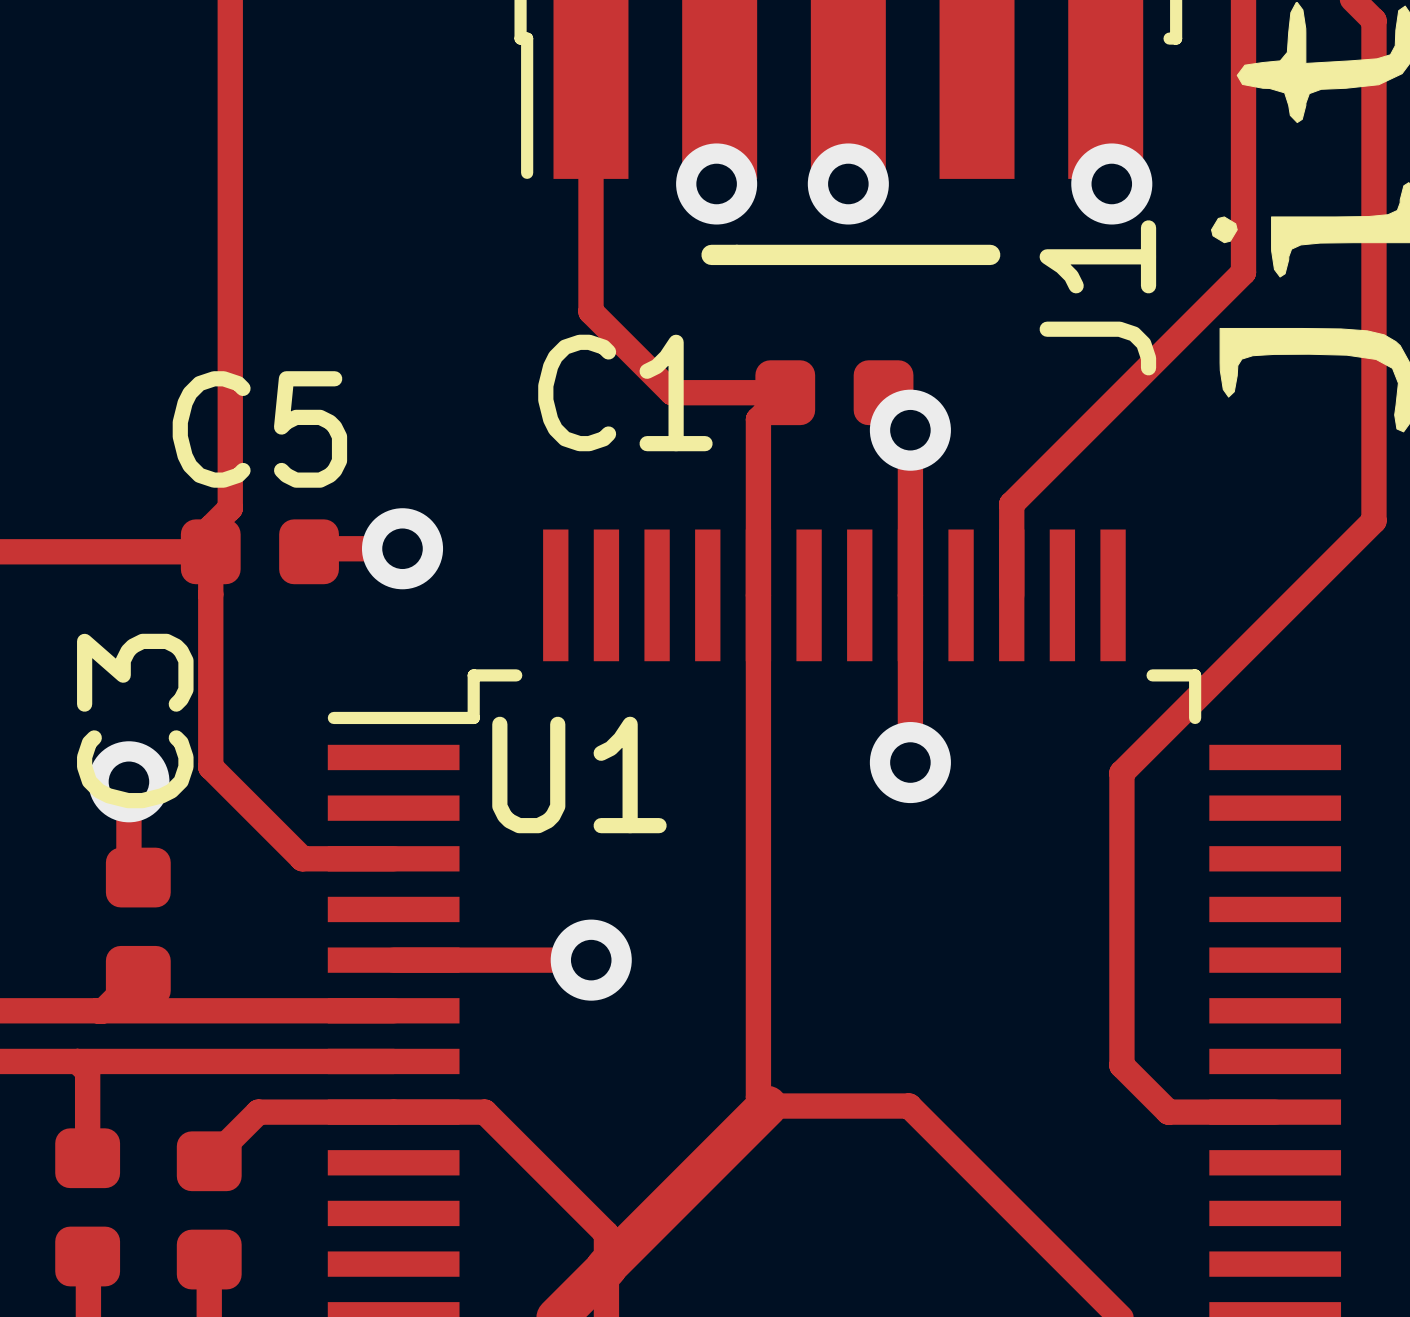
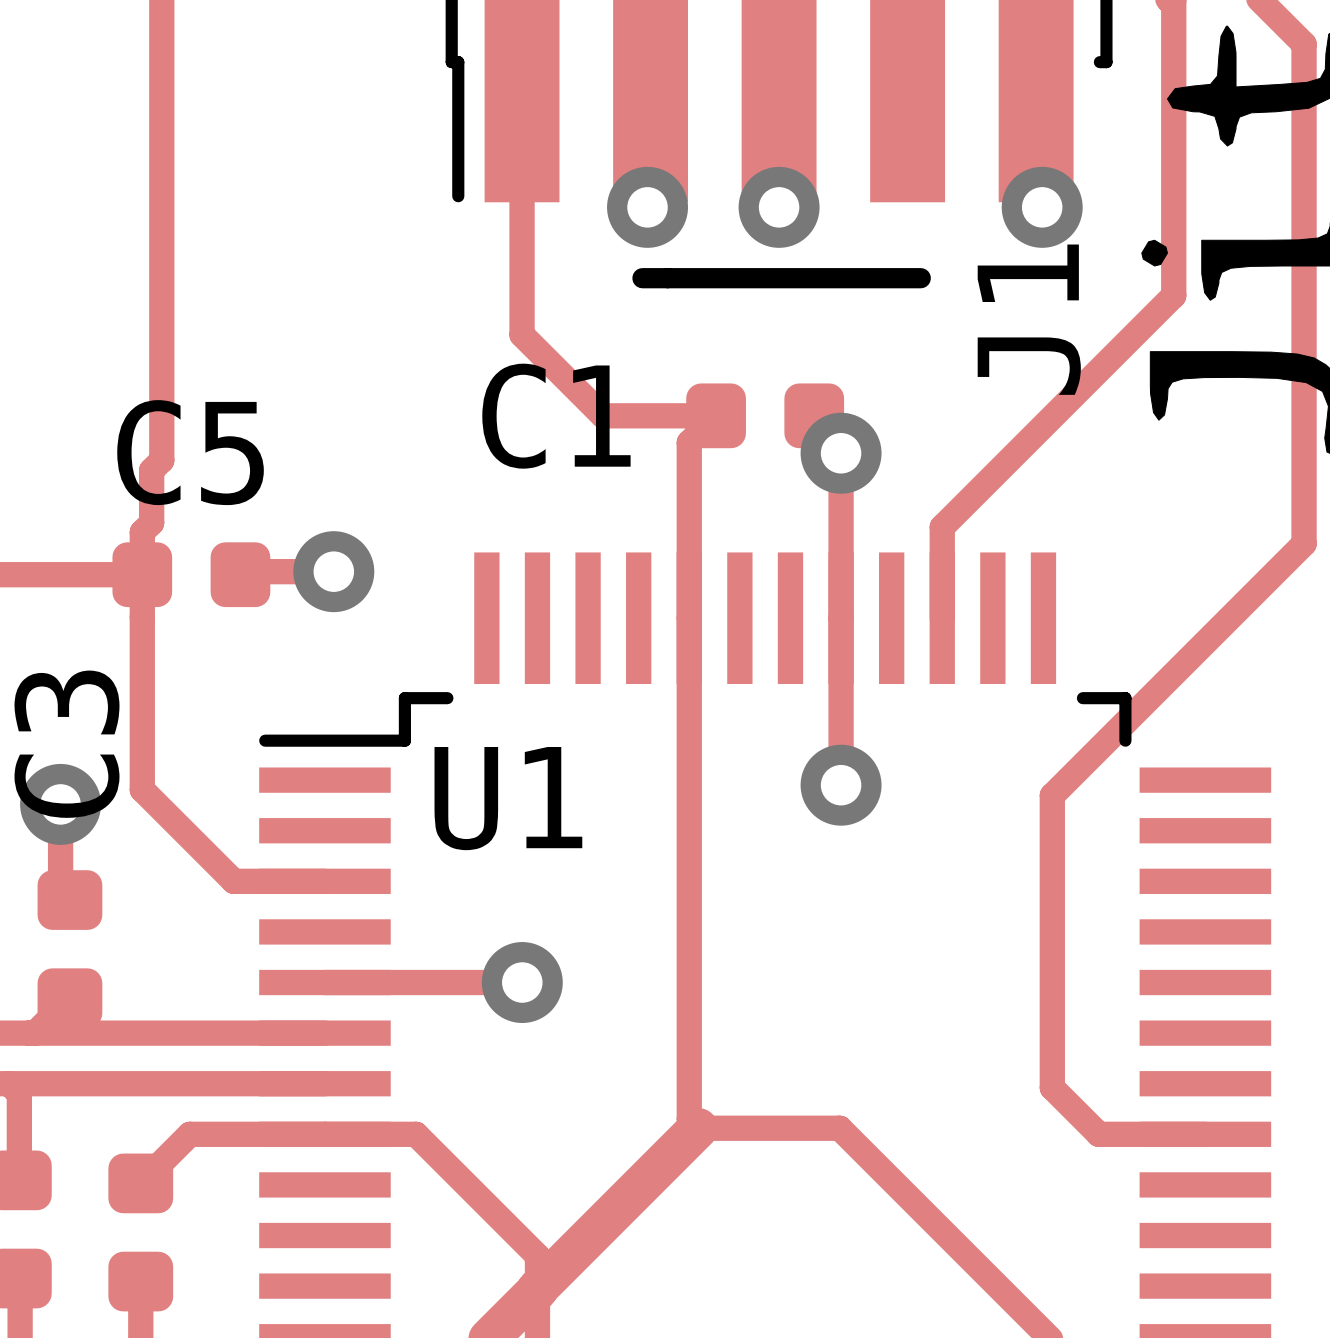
track: (230, 437) (230, 508) (210, 527) -> (161, 460) (151, 470) (151, 522) (142, 532) (142, 550)

